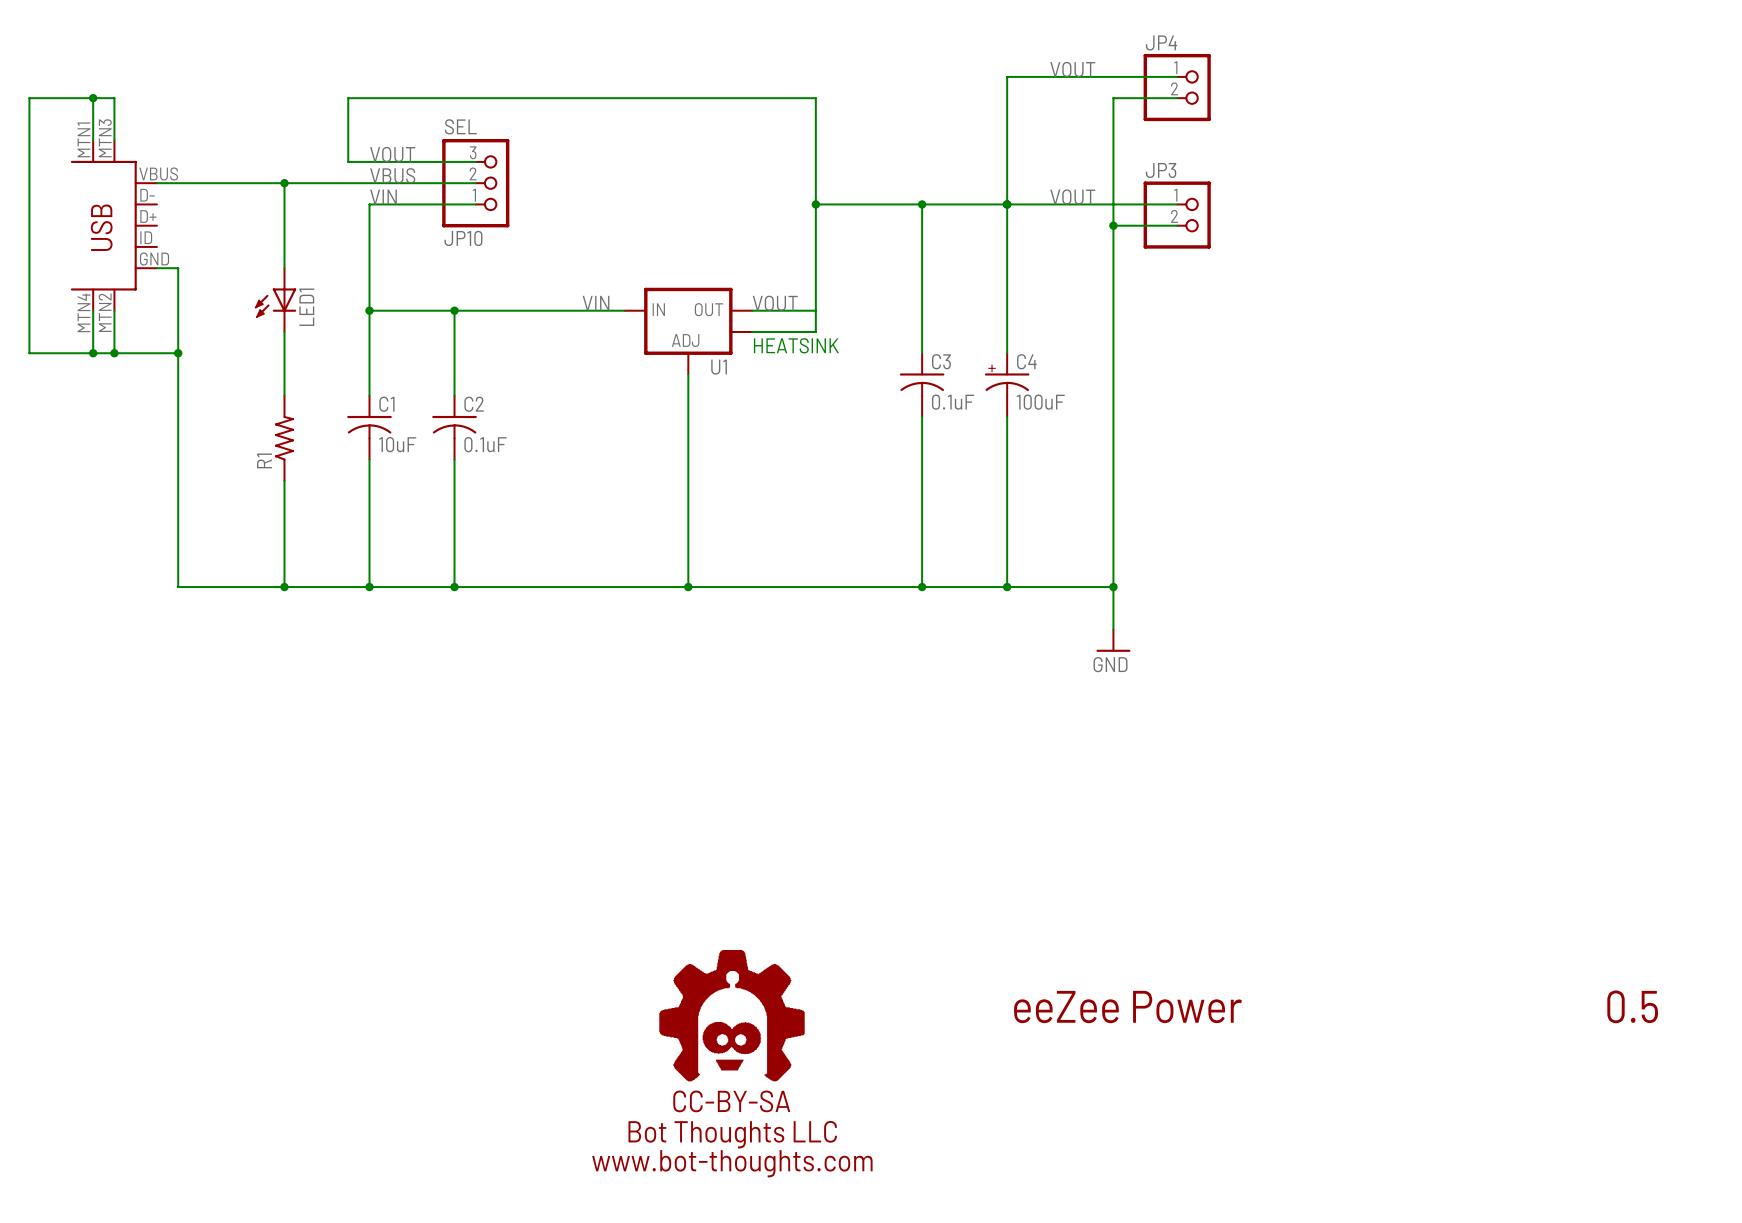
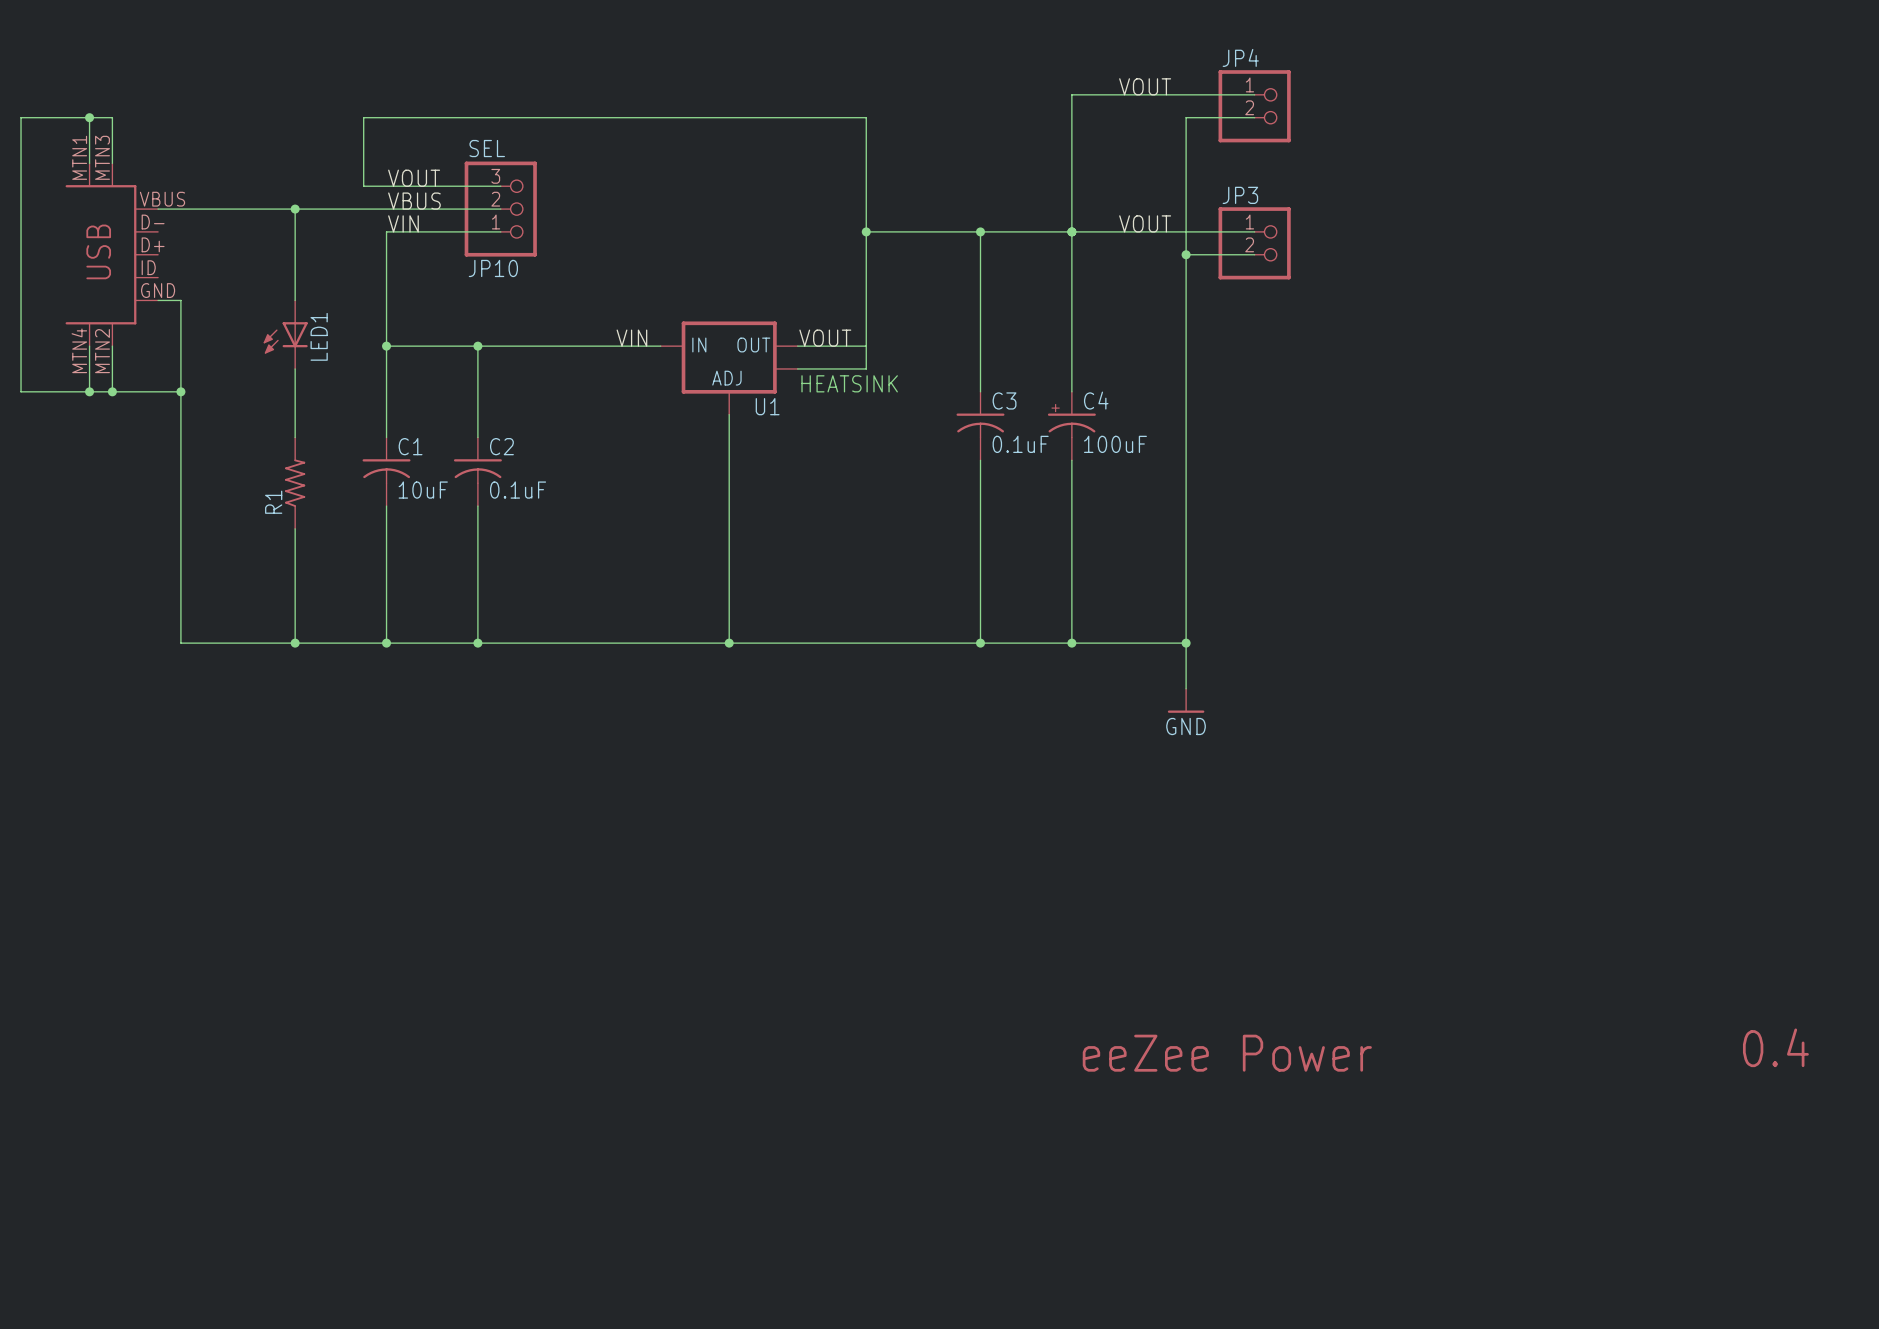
text: 0.5 (1632, 1006) -> 0.4 (1775, 1047)
text position: eeZee Power (1127, 1007) -> eeZee Power (1227, 1053)
part: (732, 1015) -> none

